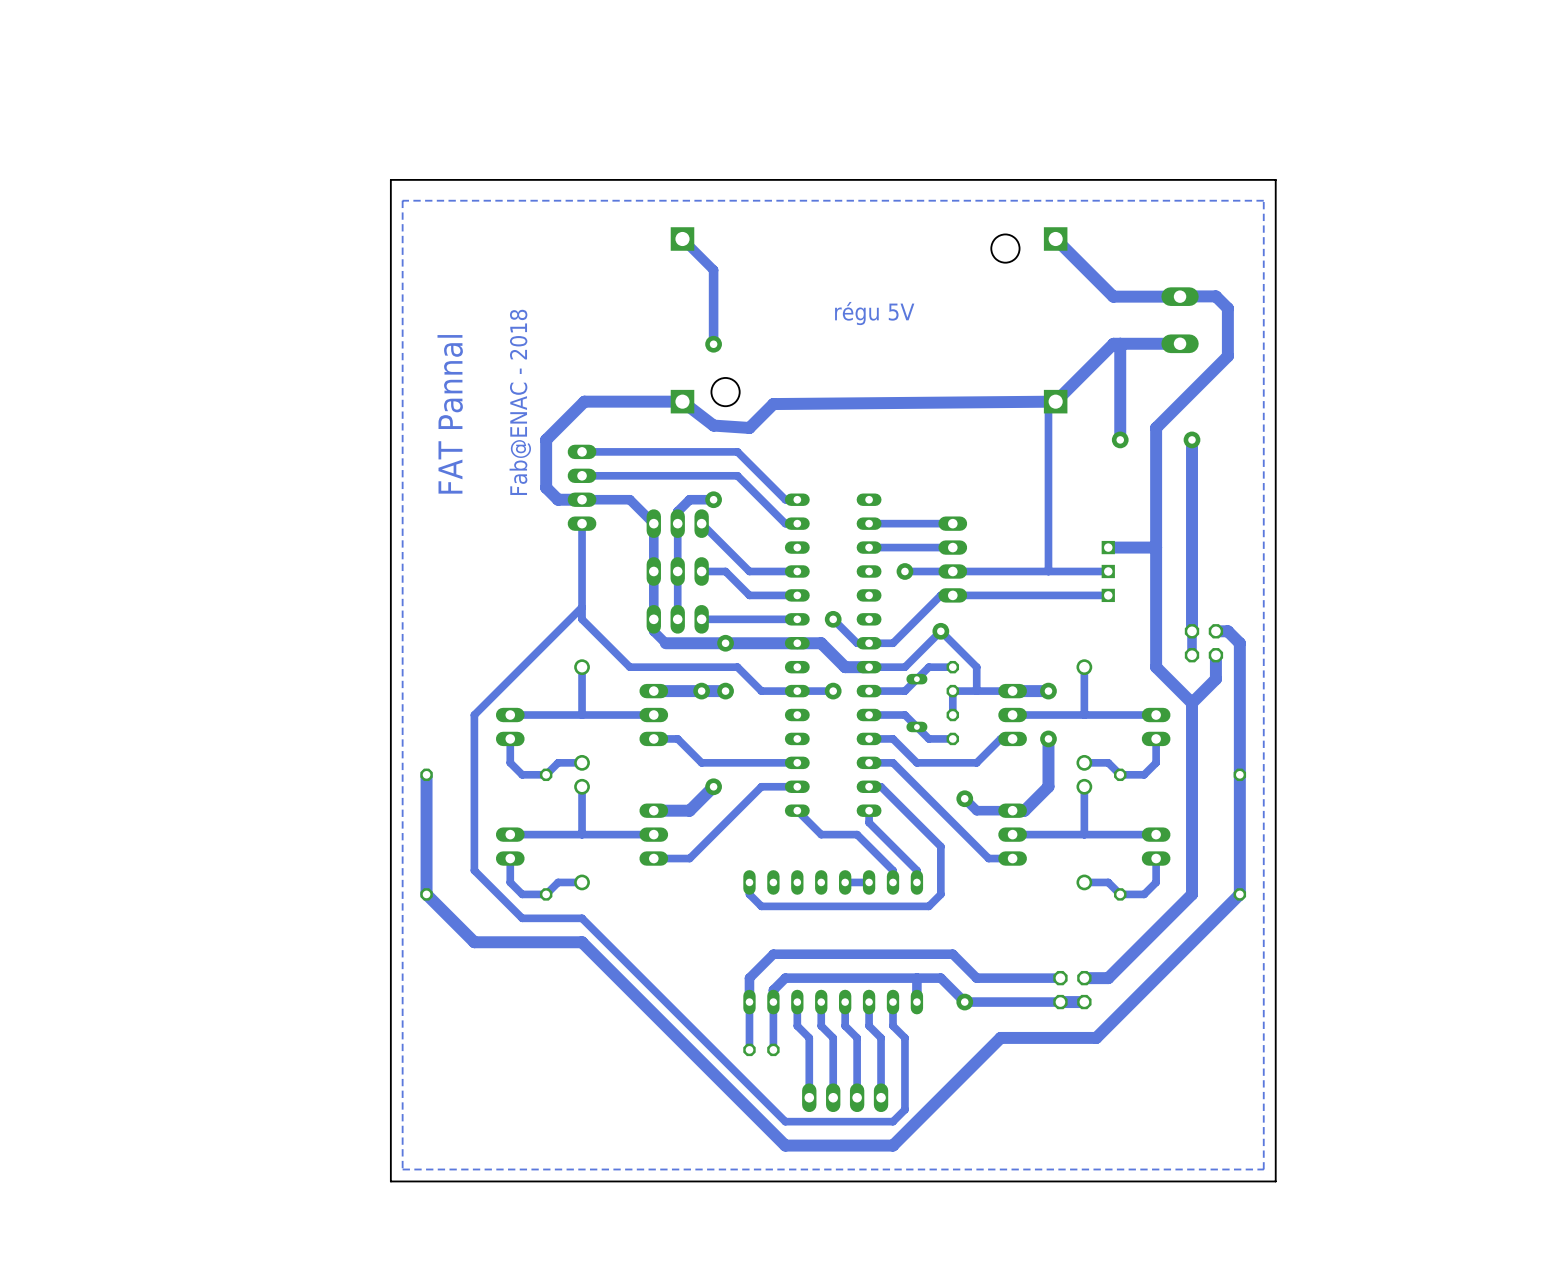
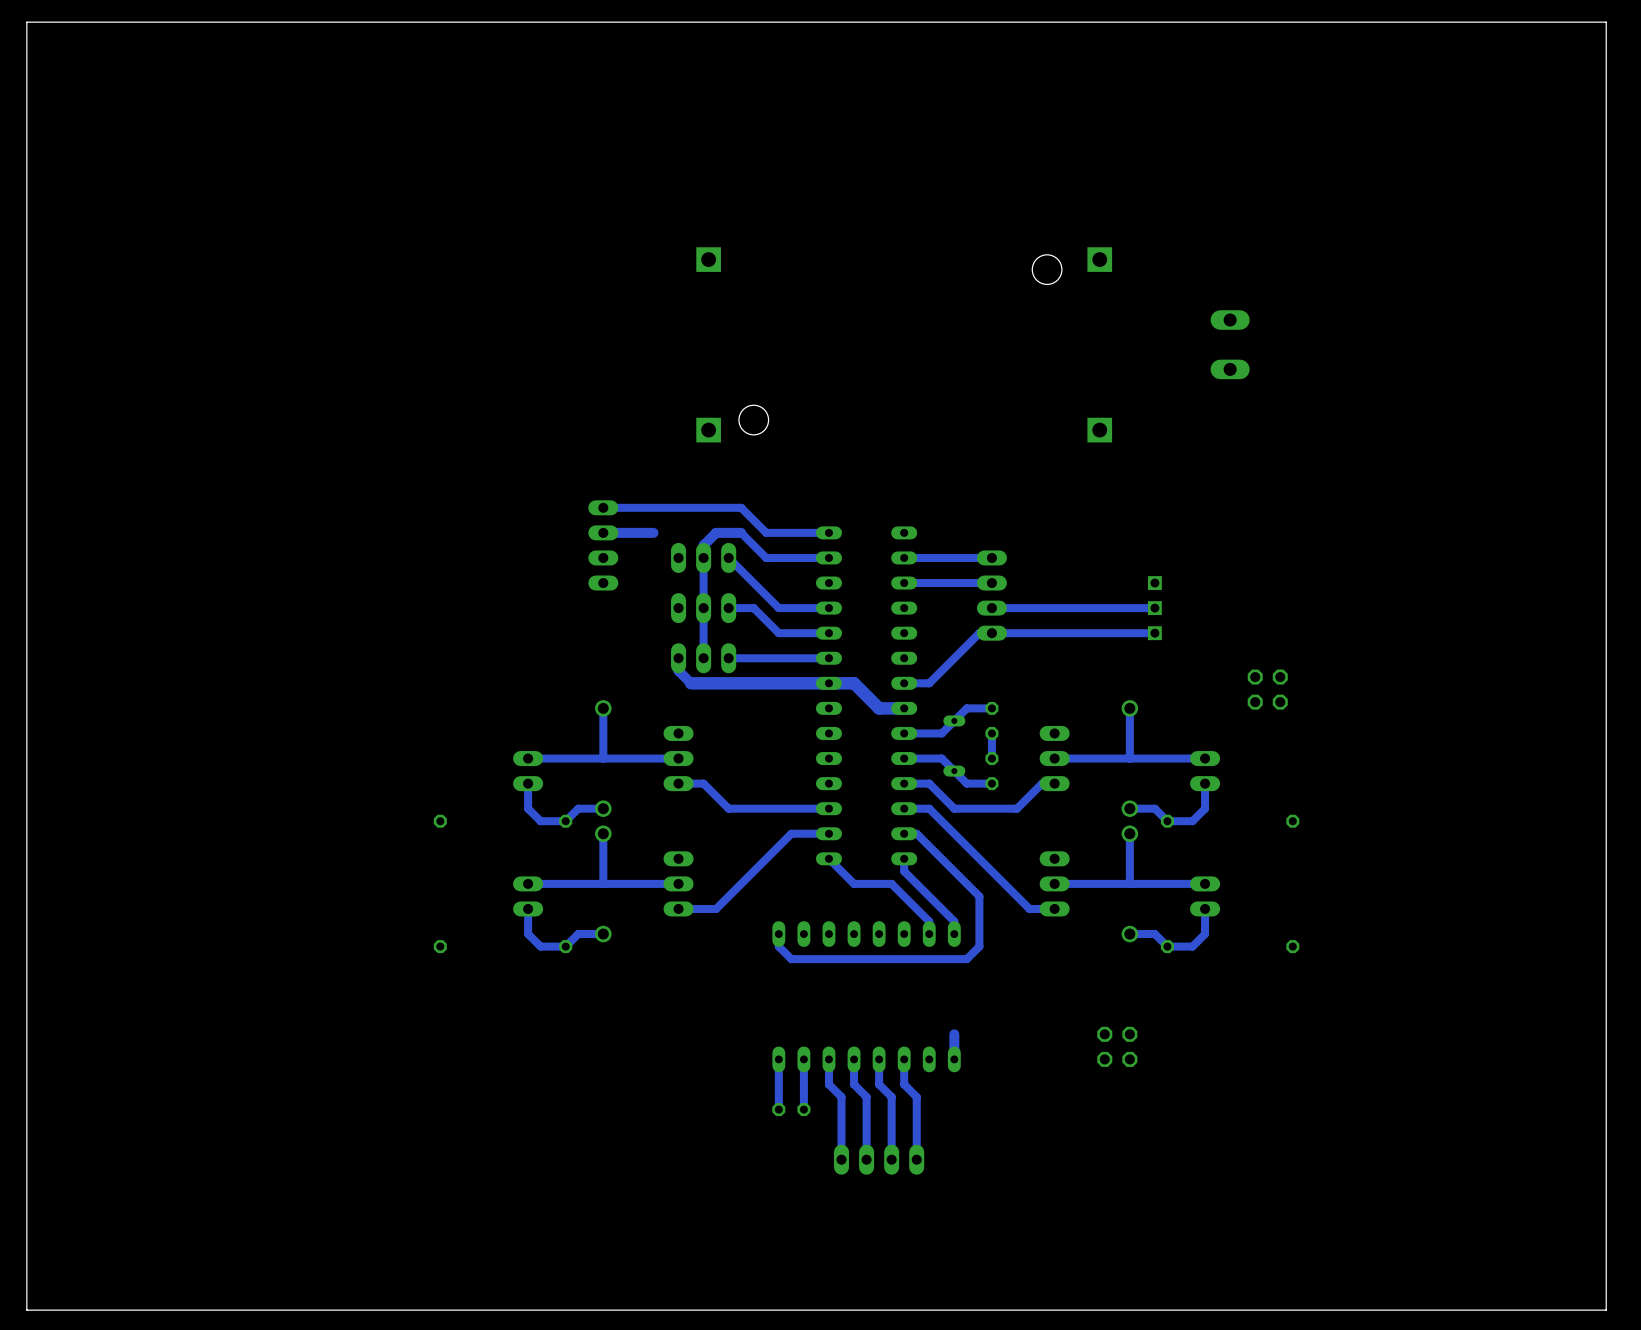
board edge: none -> (1606, 22) (26, 22) (26, 1310) (1606, 1310) (1606, 22)
board edge: (1275, 179) (390, 179) (390, 1181) (1275, 1181) (1275, 179) -> none
zone outline: (1263, 200) (1263, 1169) (402, 1169) (402, 200) (1263, 200) -> none
track: (682, 238) (713, 270) (713, 344) -> none
track: (1055, 238) (1113, 296) (1180, 296) -> none
track: (1180, 296) (1215, 296) (1227, 308) (1227, 356) (1156, 427) (1156, 667) (1192, 703) -> none
text: régu 5V (874, 313) -> none
track: (1120, 343) (1120, 439) -> none
track: (1180, 343) (1113, 343) (1055, 401) -> none
via: (713, 344) -> none
track: (1055, 401) (1050, 401) (1048, 404) (1048, 571) -> none
track: (1055, 401) (773, 404) (749, 427) (713, 425) (682, 401) (584, 401) (546, 439) (546, 487) (558, 499) (582, 499) -> none
text: Fab@ENAC - 2018 (520, 402) -> none
text: FAT Pannal (450, 414) -> none
via: (1120, 439) -> none
track: (1192, 439) (1192, 655) -> none
via: (1192, 439) -> none
track: (582, 451) (737, 451) (785, 499) -> none
track: (713, 475) (737, 475) (785, 523) -> (741, 507) (766, 532) (816, 532)
part position: (582, 487) -> (603, 545)
track: (629, 499) (653, 523) (653, 619) -> none
track: none -> (741, 532) (766, 557) (816, 557)
via: (713, 499) -> none
track: (582, 523) (582, 619) (629, 667) (737, 667) (761, 691) (833, 691) -> none
track: (1156, 547) (1108, 547) -> none
via: (904, 571) -> none
track: (952, 571) (904, 571) -> none
track: (582, 607) (474, 715) (474, 870) (522, 918) (582, 918) (785, 1121) (893, 1121) (904, 1109) (904, 1037) (893, 1025) (893, 1002) -> none
track: (833, 619) (857, 643) (869, 643) -> none
via: (833, 619) -> none
via: (940, 631) -> none
track: (1215, 631) (1227, 631) (1239, 643) (1239, 894) (1096, 1037) (1000, 1037) (893, 1145) (785, 1145) (582, 942) (474, 942) (426, 894) (426, 774) -> none
via: (725, 643) -> none
part position: (1203, 643) -> (1267, 689)
track: (1215, 655) (1215, 679) (1192, 703) -> none
track: (869, 667) (904, 667) (940, 631) (976, 667) (976, 691) -> none
via: (701, 691) -> none
track: (725, 691) (653, 691) -> none
via: (725, 691) -> none
via: (833, 691) -> none
track: (1048, 691) (952, 691) -> none
via: (1048, 691) -> none
track: (1192, 703) (1192, 894) (1108, 978) (1084, 978) -> none
track: (1048, 738) (1048, 786) (1024, 810) (976, 810) (964, 798) -> none
via: (1048, 738) -> none
track: (713, 786) (689, 810) (653, 810) -> none
via: (713, 786) -> none
via: (964, 798) -> none
track: (869, 882) (845, 882) -> none
track: (1060, 978) (976, 978) (952, 954) (773, 954) (749, 978) (749, 1002) -> none
via: (964, 1002) -> none
track: (1084, 1002) (964, 1002) (940, 978) (785, 978) (773, 990) (773, 1002) -> none

